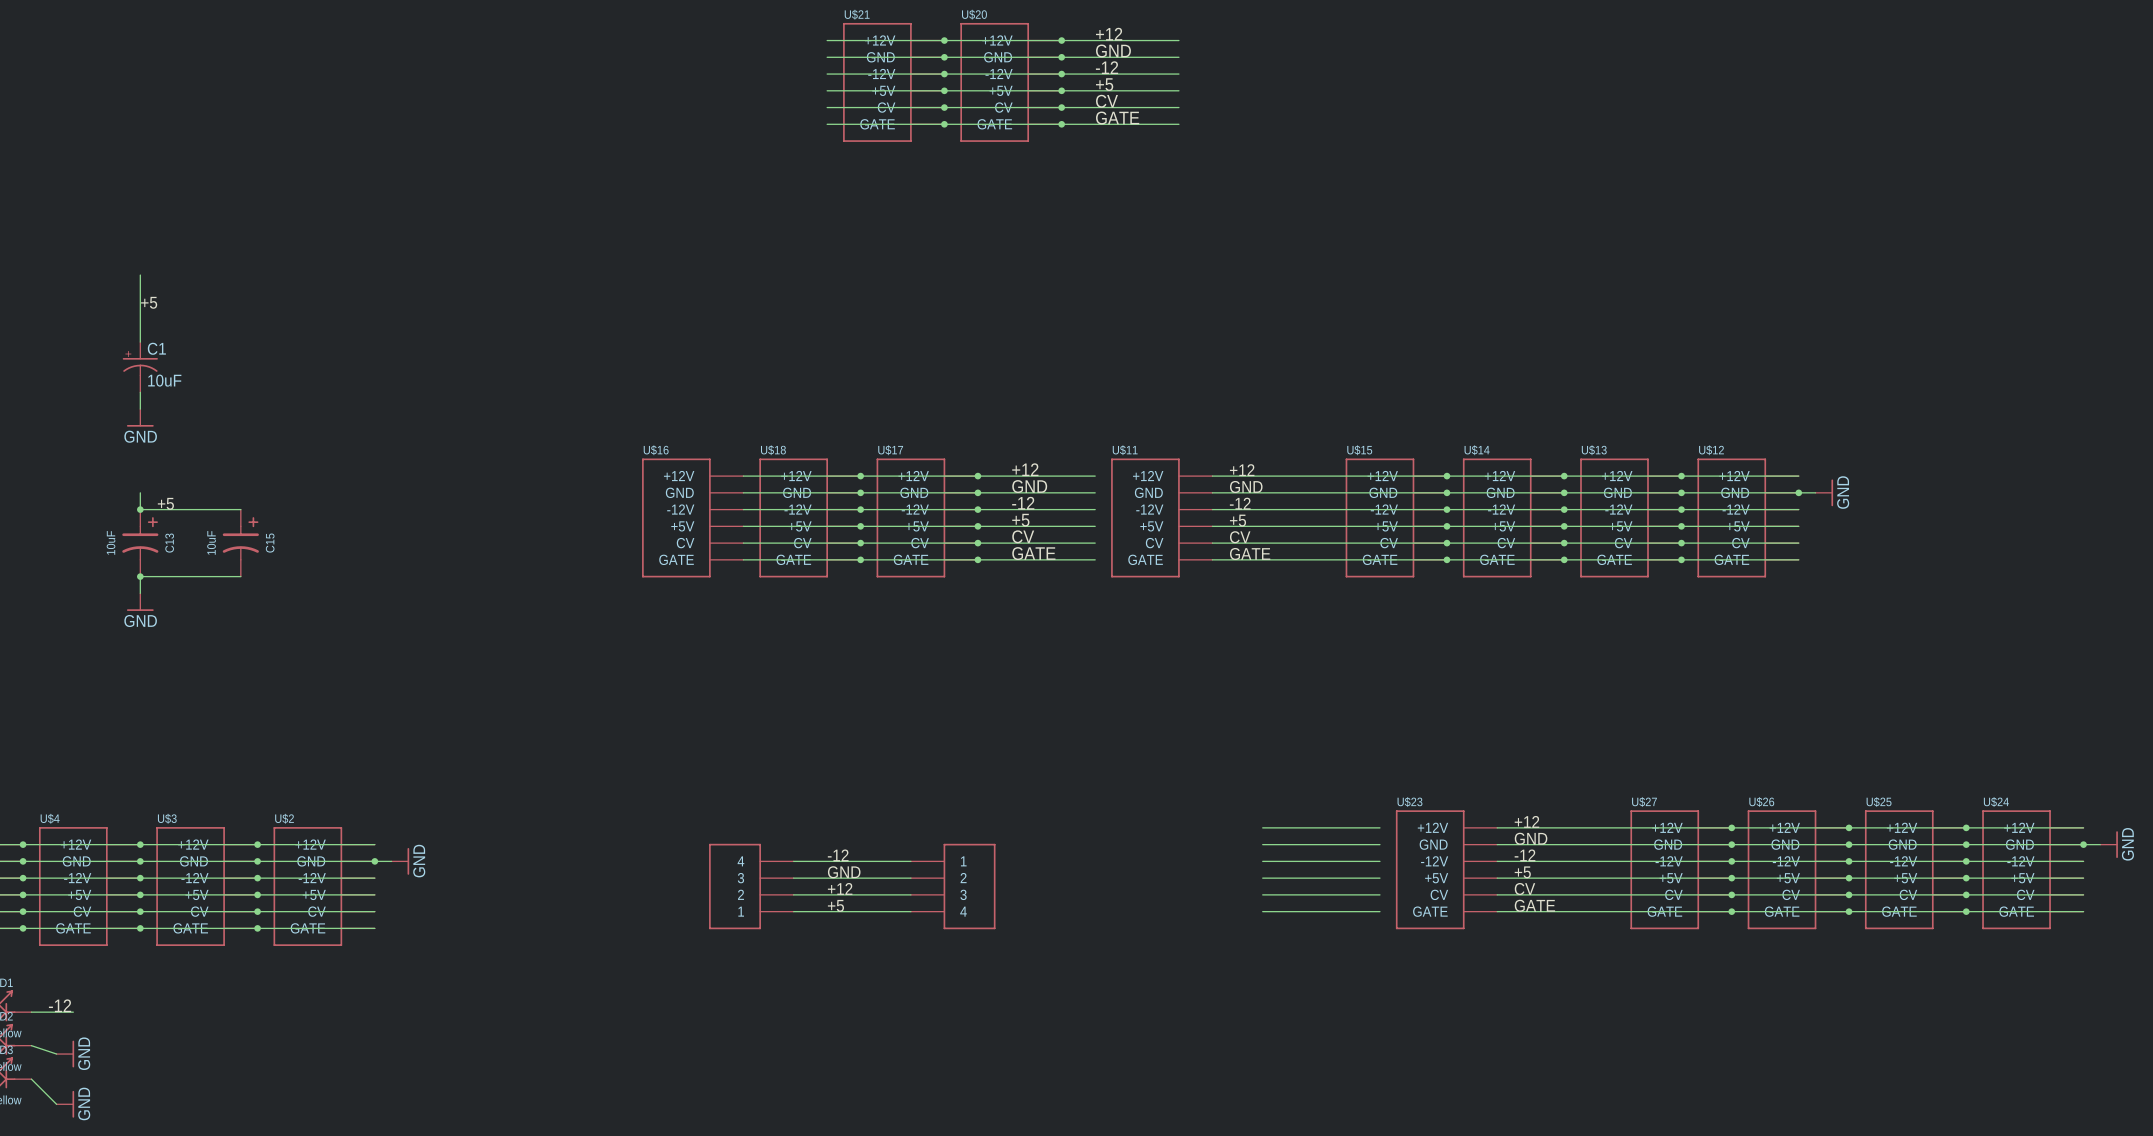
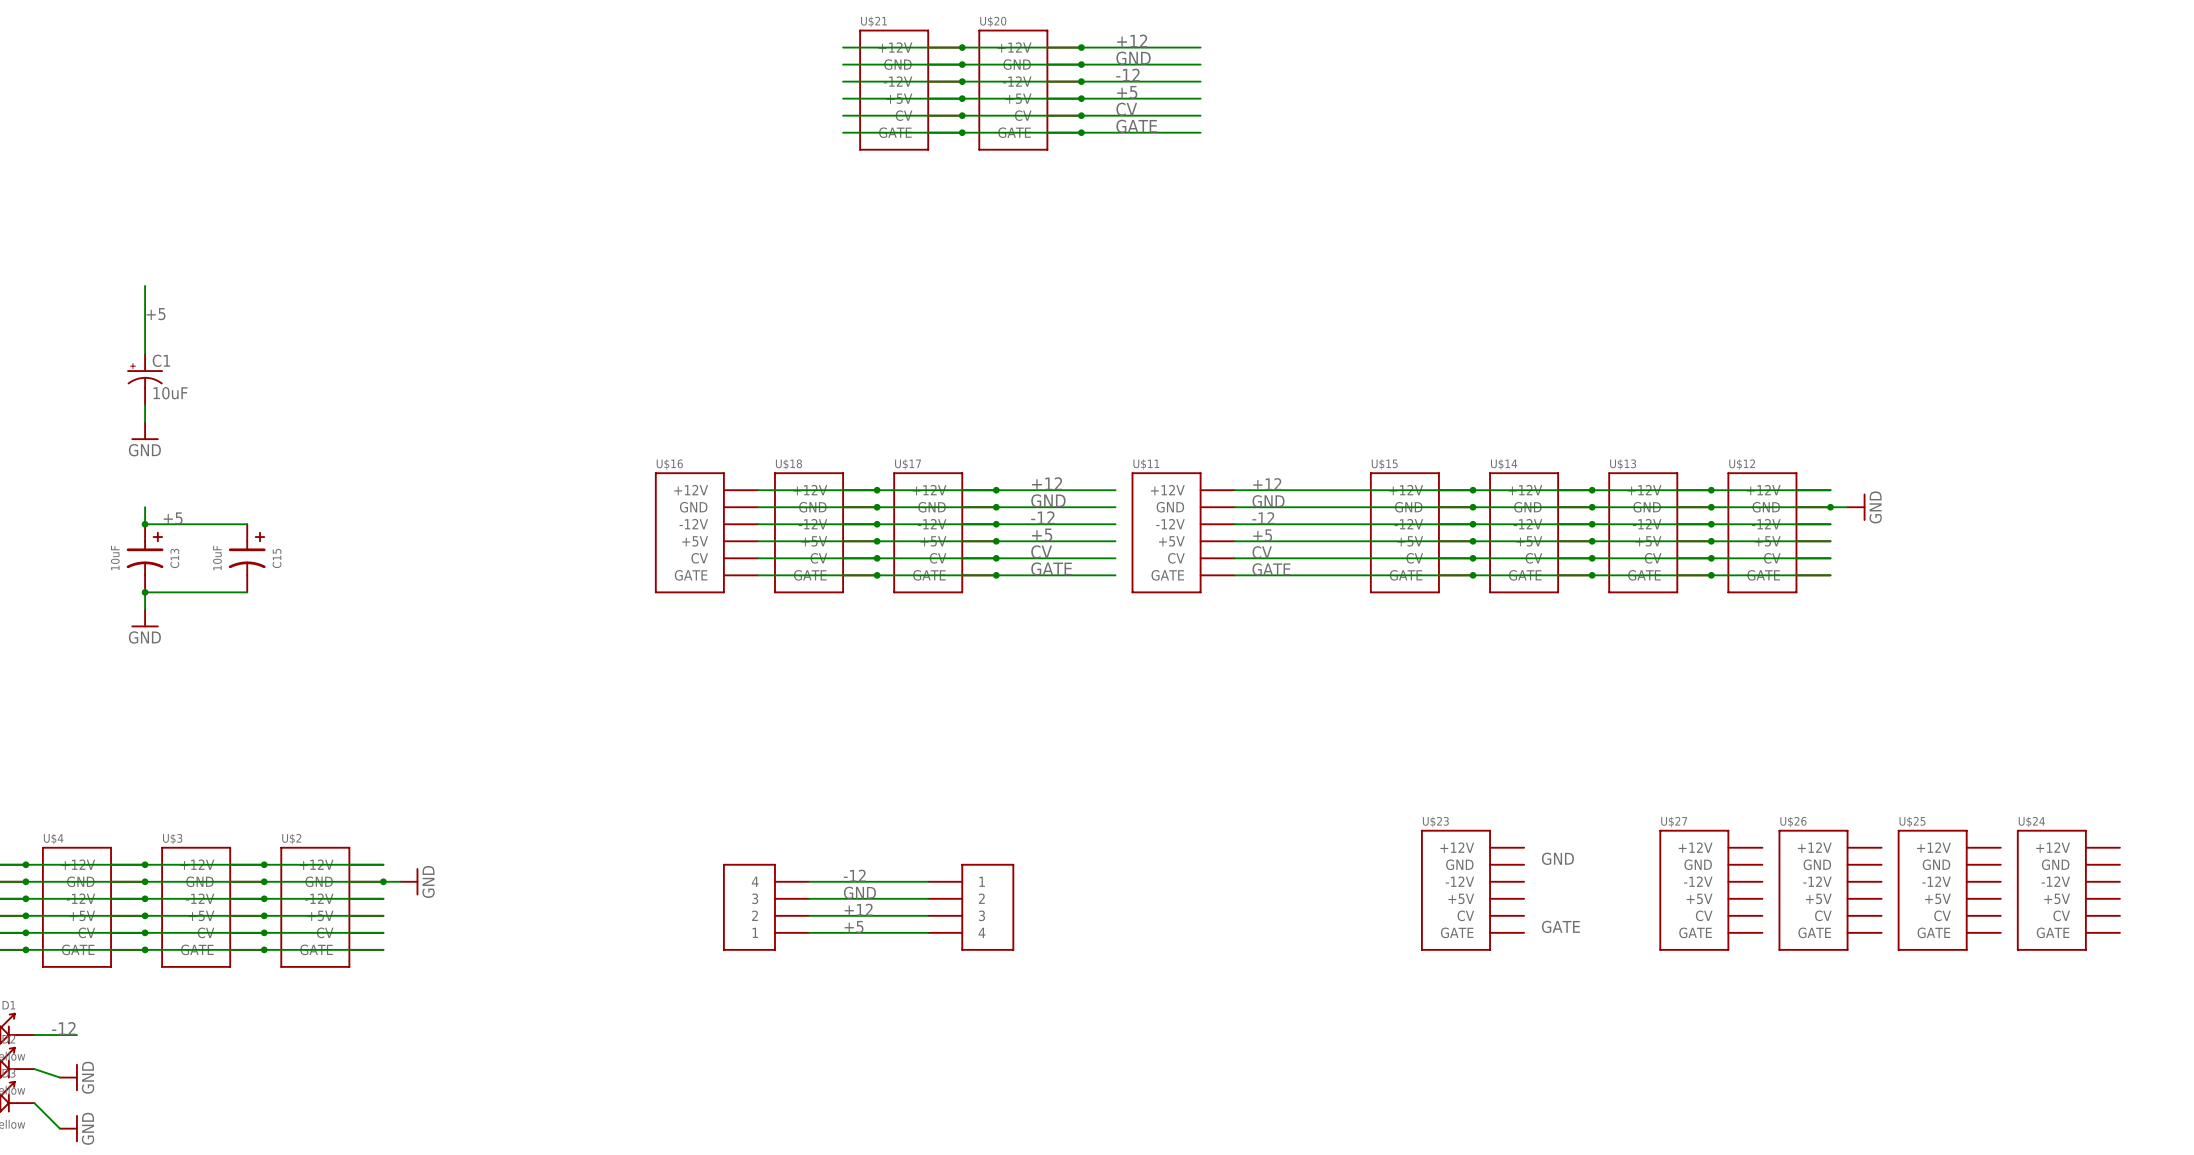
label: +12 (1526, 821) -> none
wire: (1262, 827) (1379, 827) -> none
wire: (1497, 827) (2083, 827) -> none
junction: (1731, 827) -> none
junction: (1849, 827) -> none
junction: (1966, 827) -> none
wire: (1262, 844) (1379, 844) -> none
wire: (1497, 844) (2100, 844) -> none
junction: (1731, 844) -> none
junction: (1849, 844) -> none
junction: (1966, 844) -> none
junction: (2083, 844) -> none
power symbol: GND (2109, 844) -> none
label: -12 (1525, 855) -> none
wire: (1262, 861) (1379, 861) -> none
wire: (1497, 861) (2083, 861) -> none
junction: (1731, 861) -> none
junction: (1849, 861) -> none
junction: (1966, 861) -> none
label: +5 (1522, 872) -> none
wire: (1262, 878) (1379, 878) -> none
wire: (1497, 878) (2083, 878) -> none
junction: (1731, 878) -> none
junction: (1849, 878) -> none
junction: (1966, 878) -> none
label: CV (1524, 889) -> none
wire: (1262, 894) (1379, 894) -> none
wire: (1497, 894) (2083, 894) -> none
junction: (1731, 894) -> none
junction: (1849, 894) -> none
junction: (1966, 894) -> none
wire: (1262, 911) (1379, 911) -> none
wire: (1497, 911) (2083, 911) -> none
junction: (1731, 911) -> none
junction: (1849, 911) -> none
junction: (1966, 911) -> none

